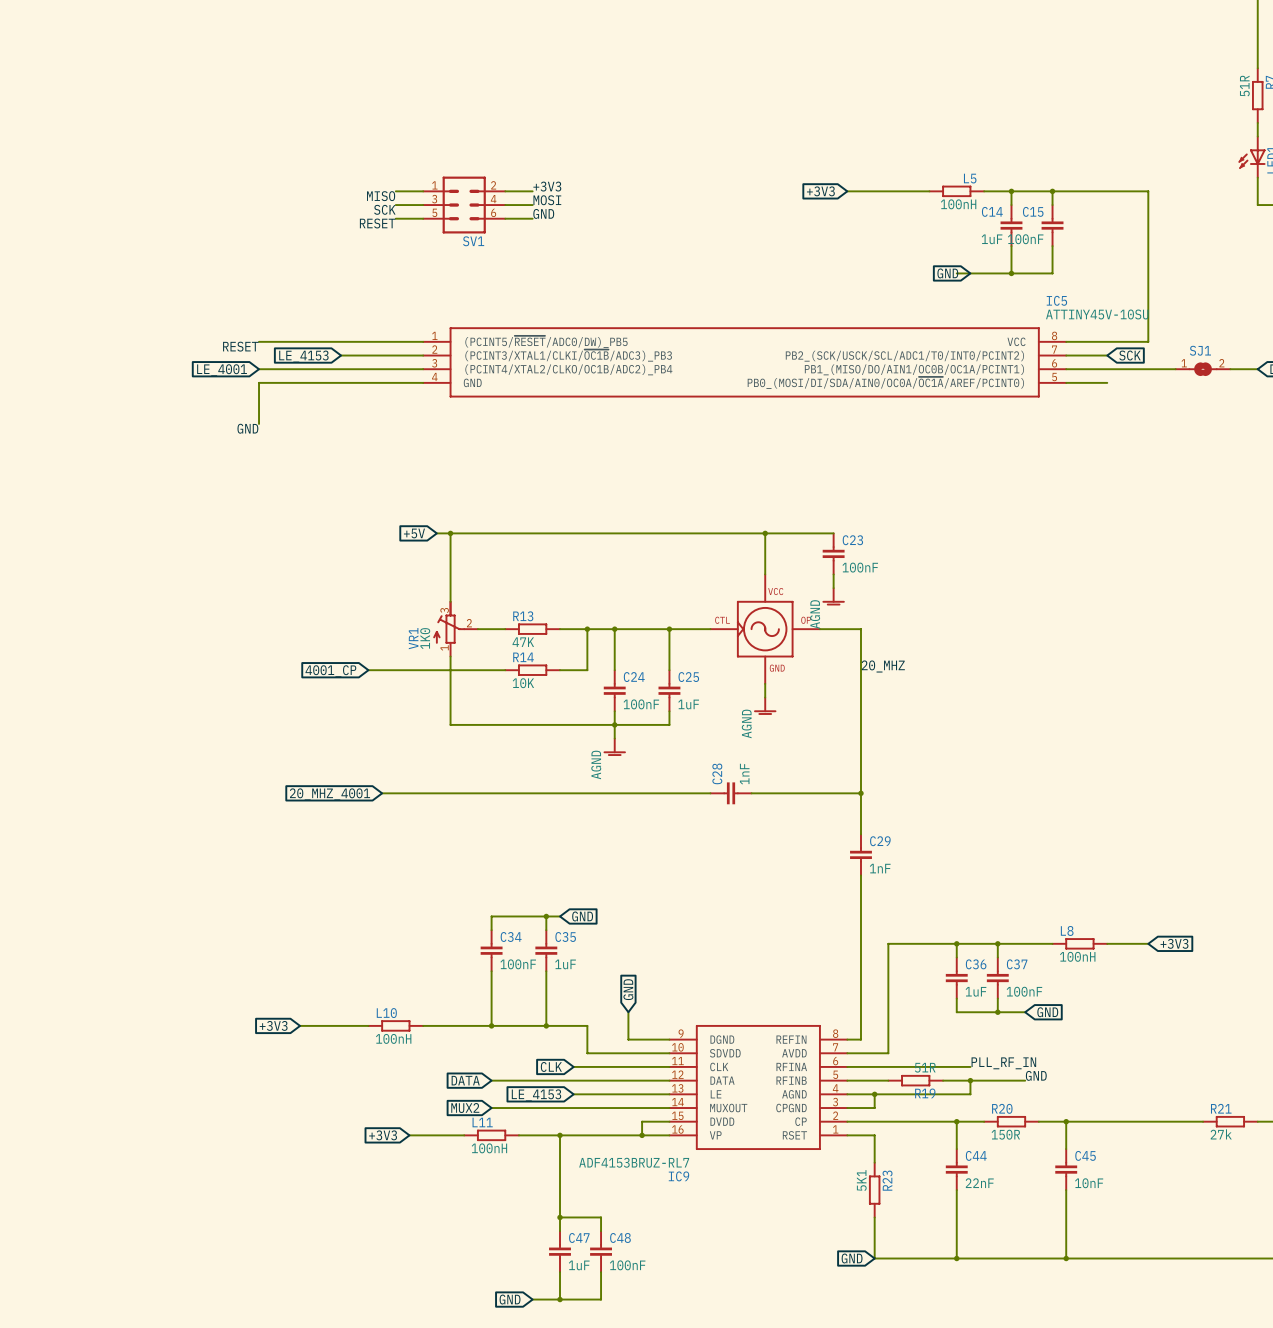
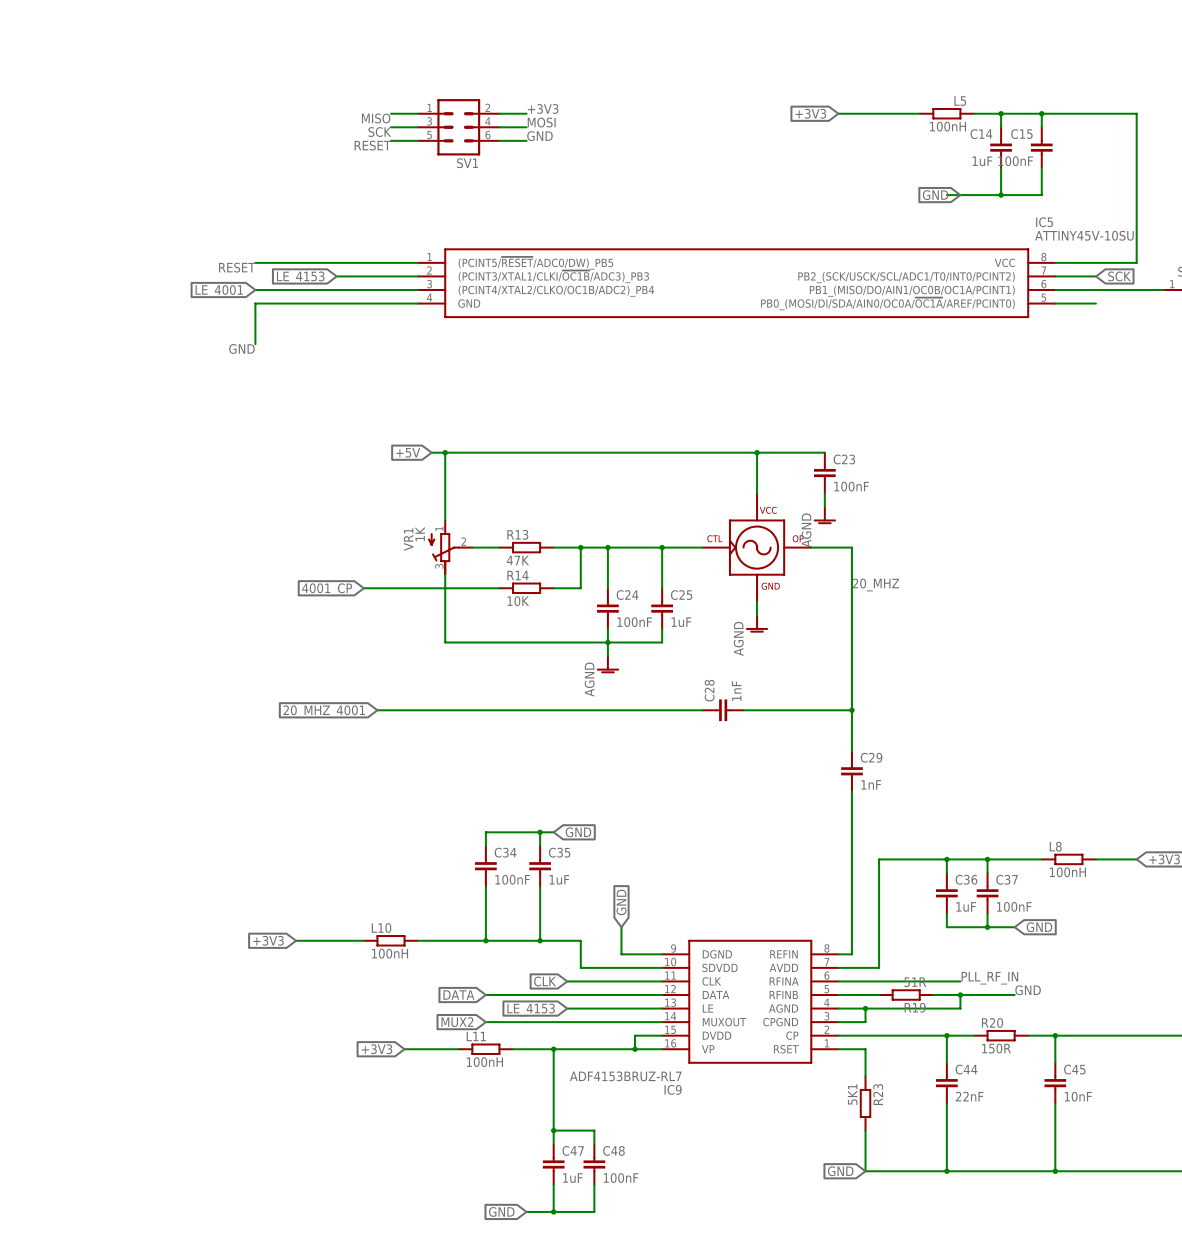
VR1 flip: as is (449, 622) -> up-down (443, 554)
VR1 value: 1K0 (425, 638) -> 1K (420, 534)

